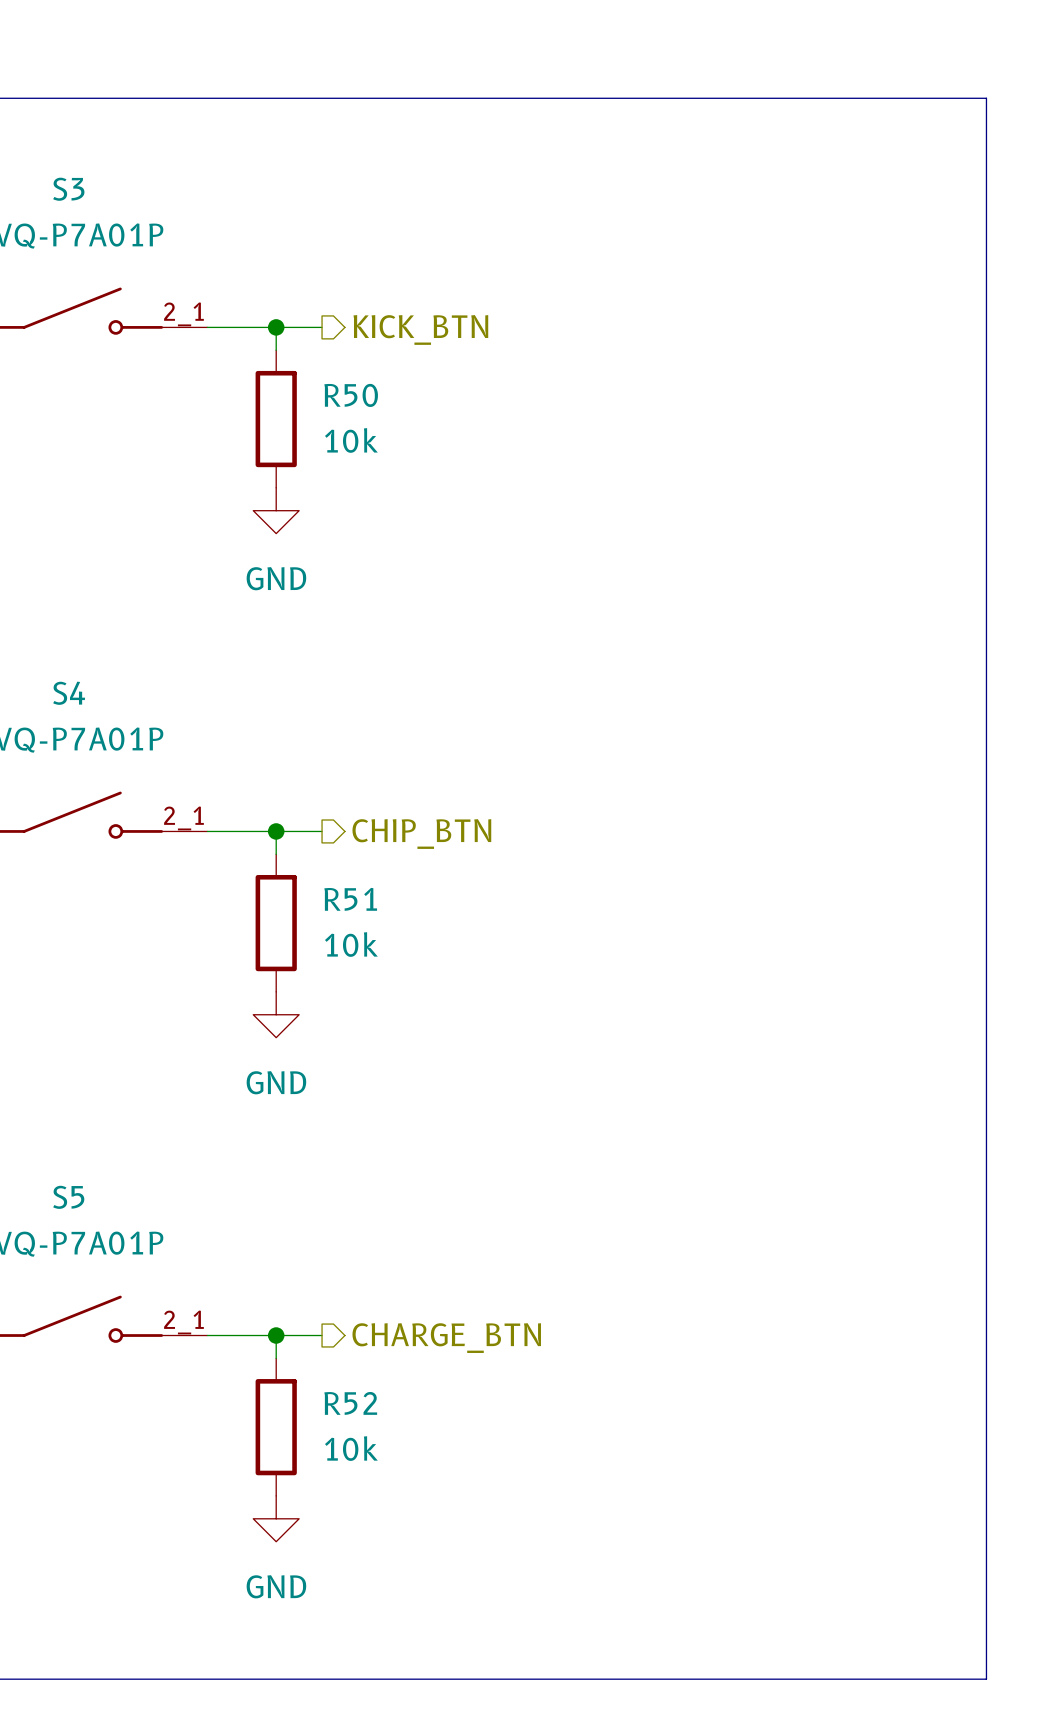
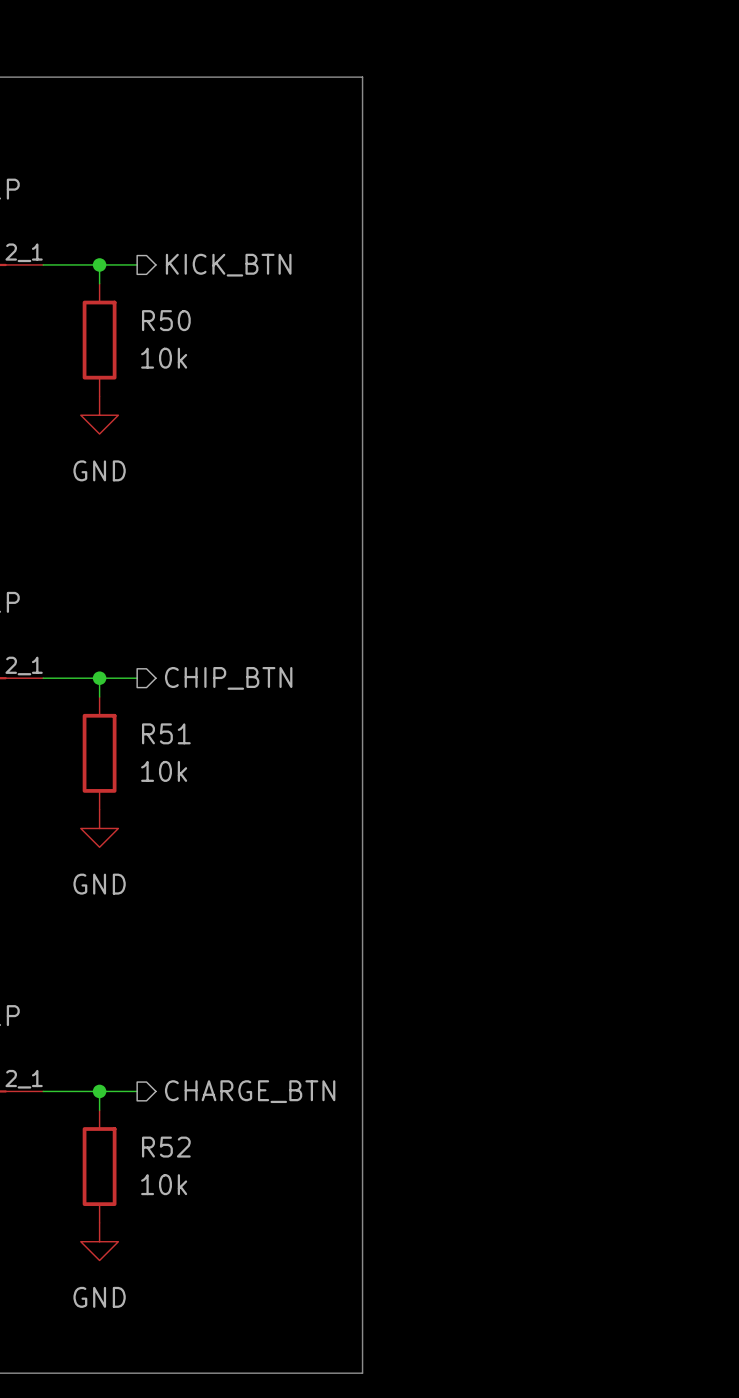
line: (596, 98) (986, 98) (986, 1679) (596, 1679) -> (362, 77) (362, 1373)

